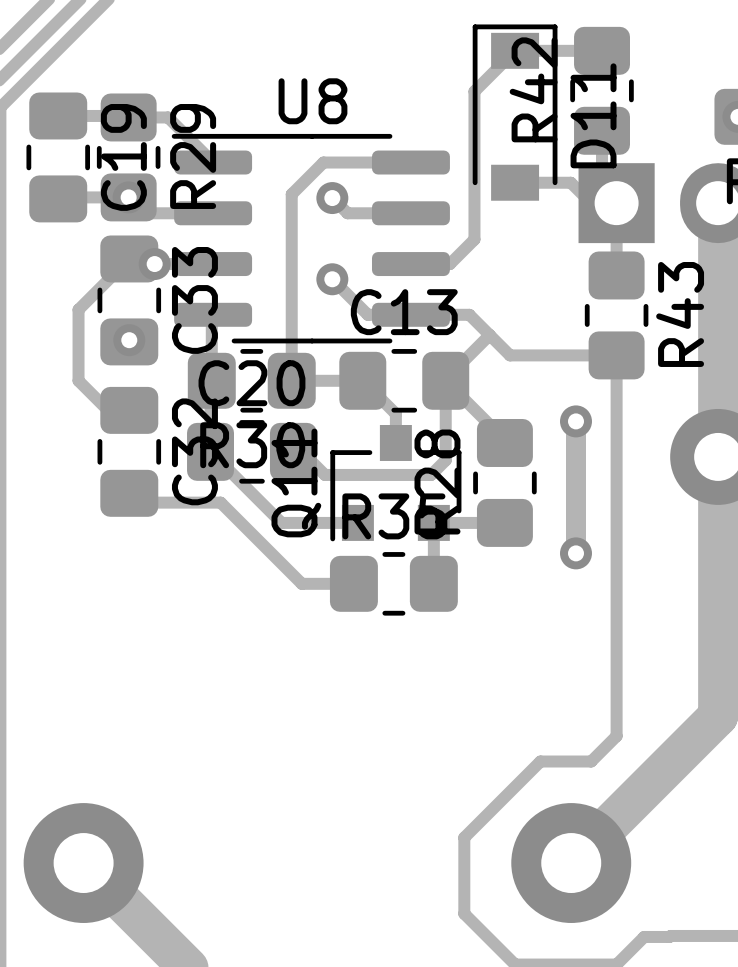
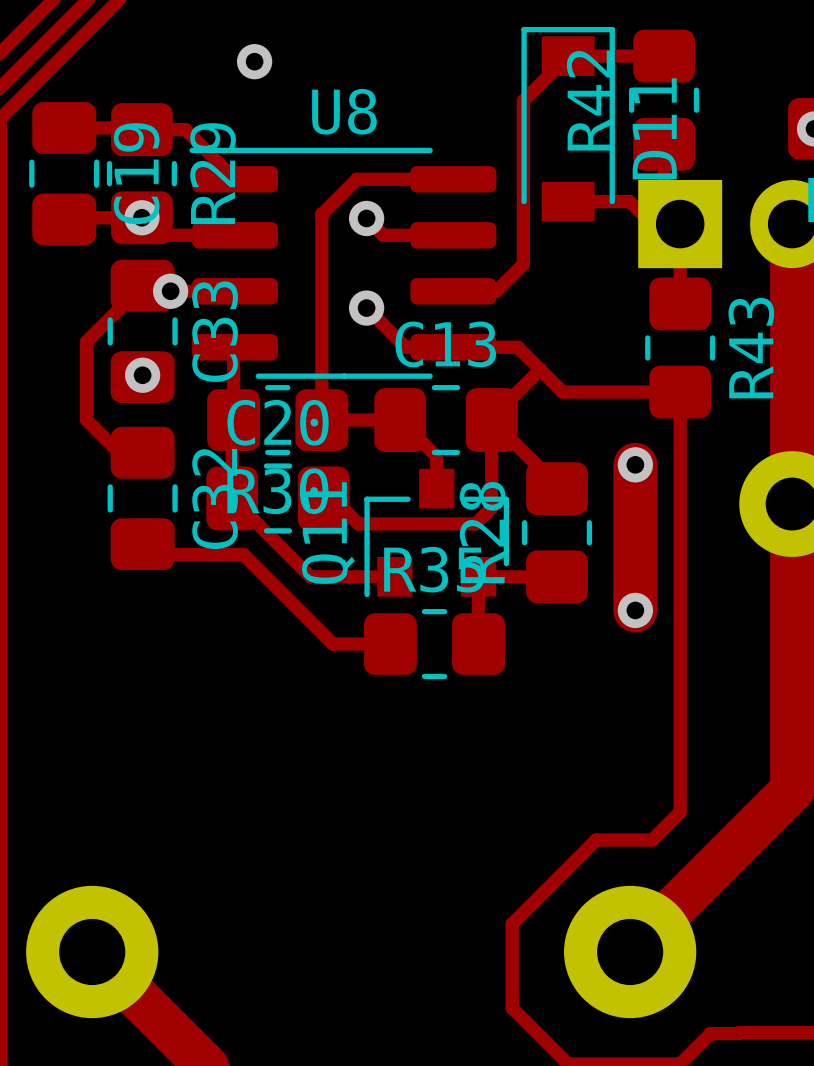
via: none -> (254, 61)
track width: thin (575, 421) (575, 553) -> thick (635, 464) (635, 610)

